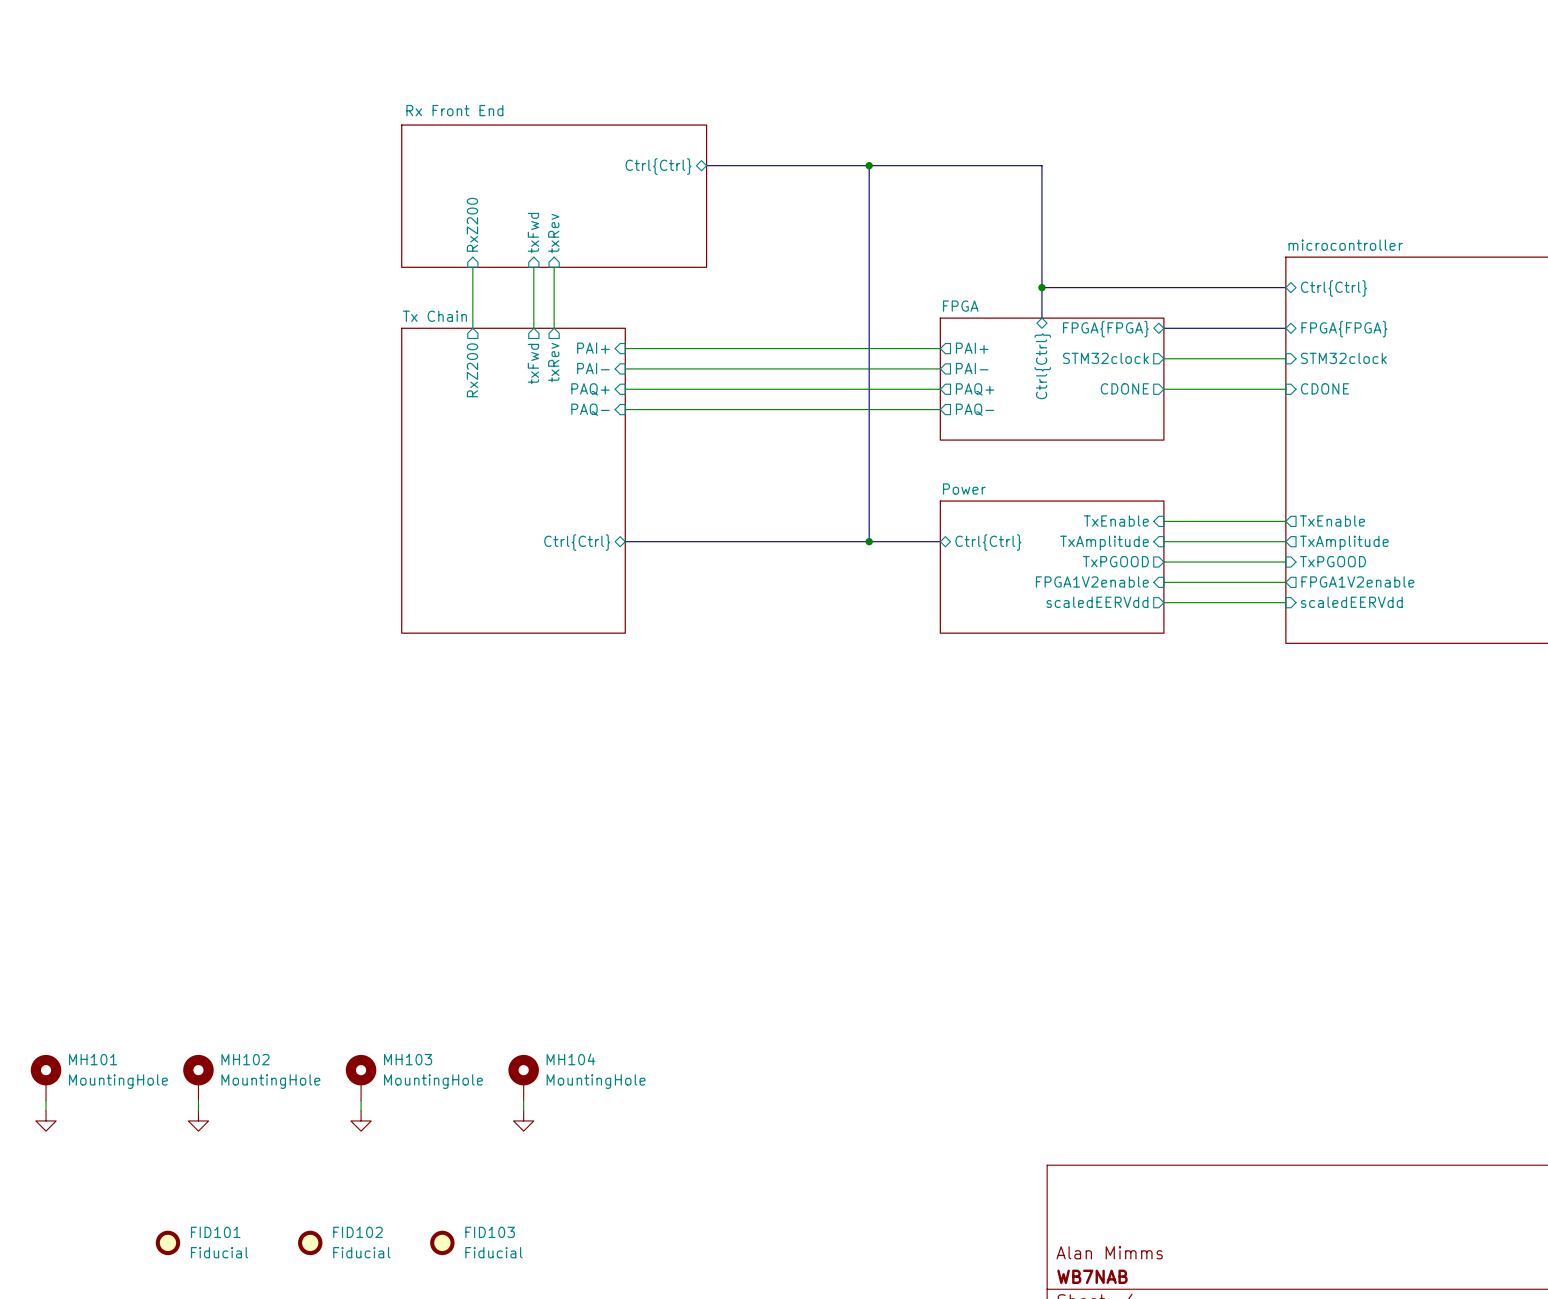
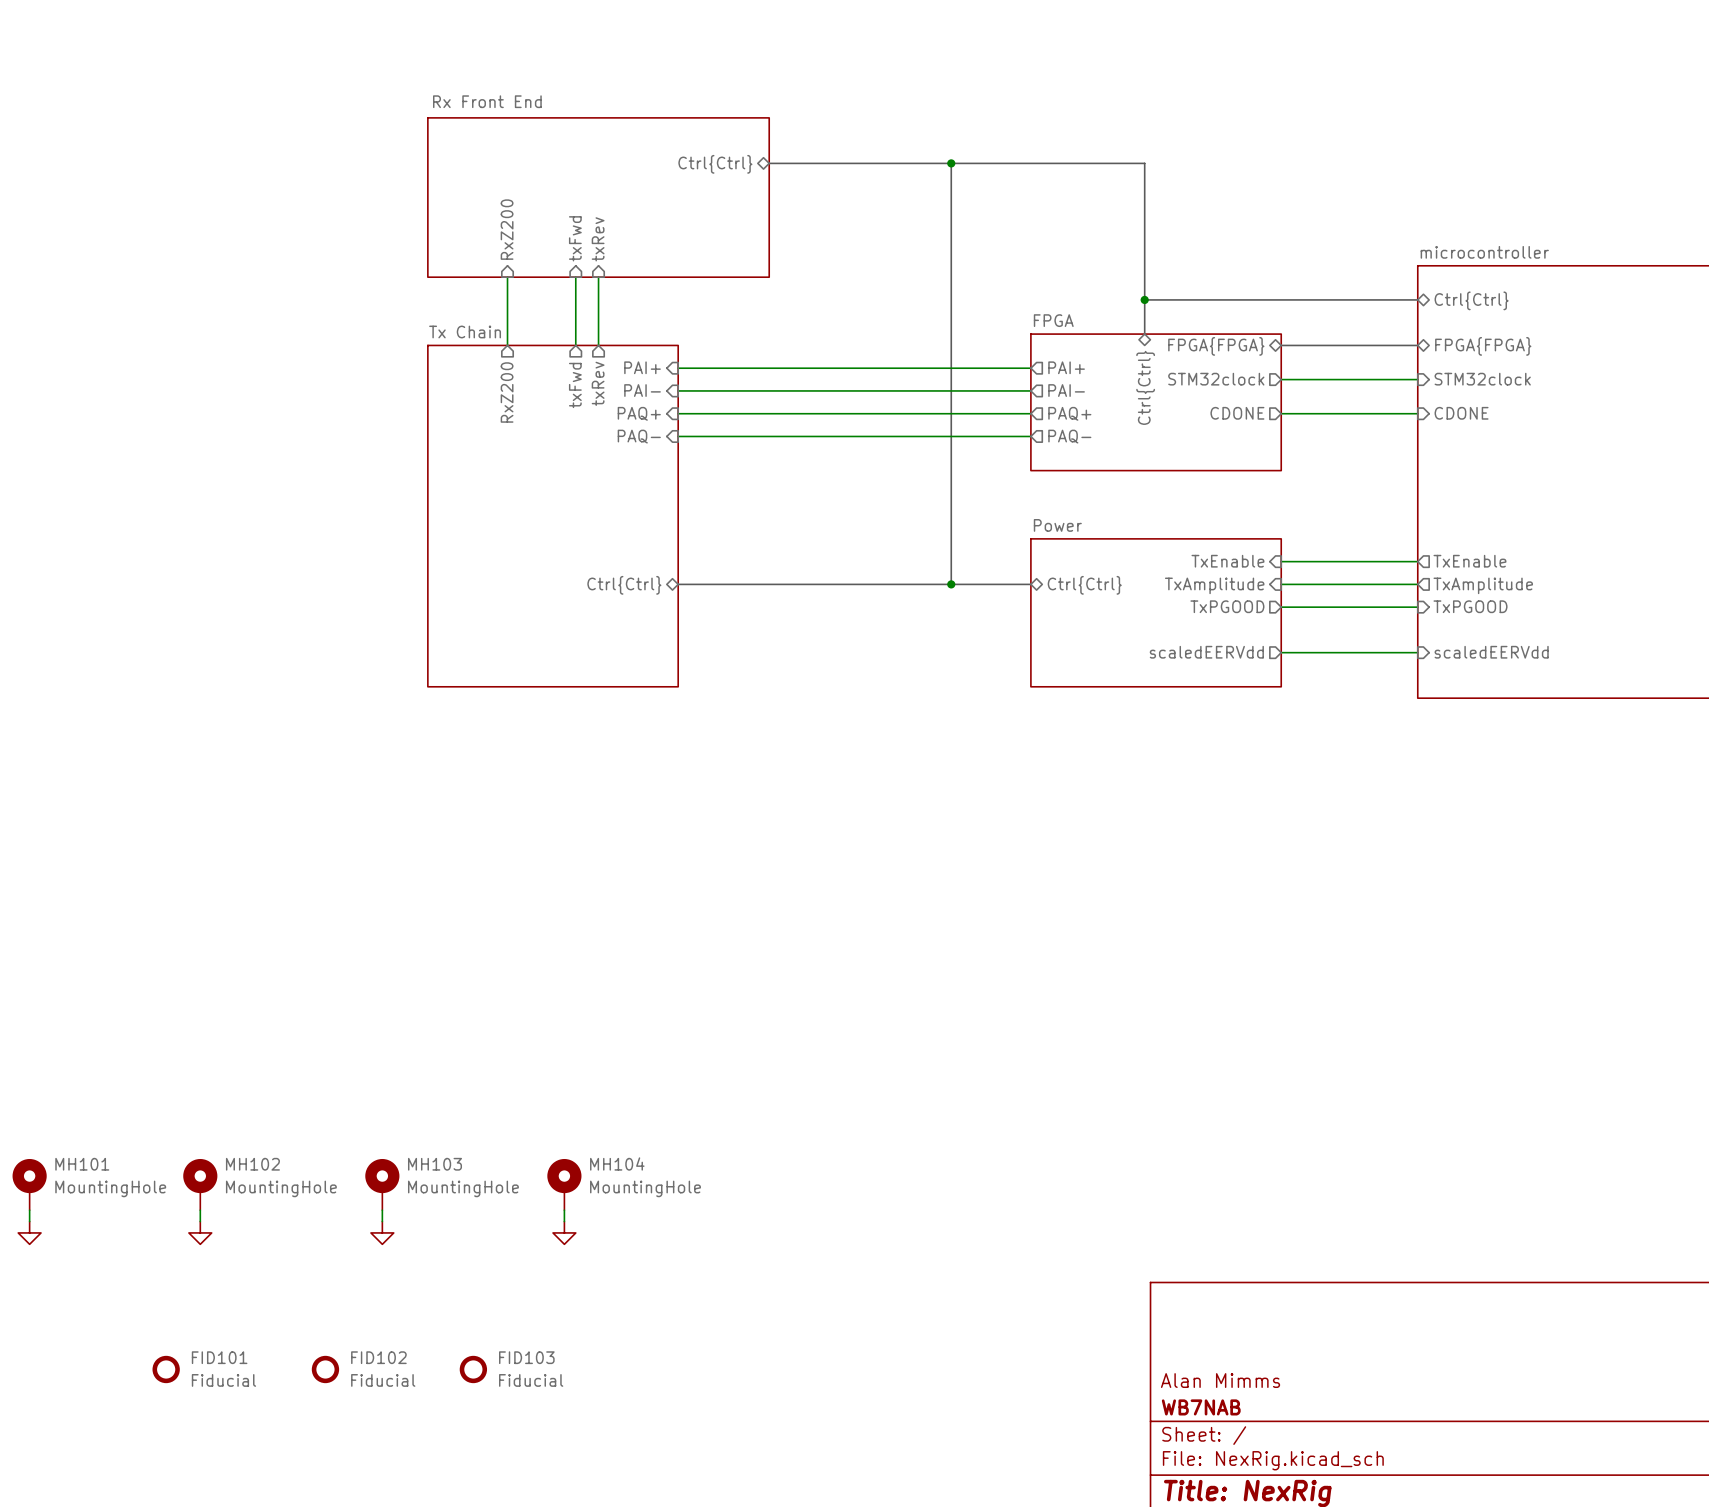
sheet pin: FPGA1V2enable (1092, 581) -> none
sheet pin: FPGA1V2enable (1357, 581) -> none
wire: (1163, 582) (1285, 582) -> none

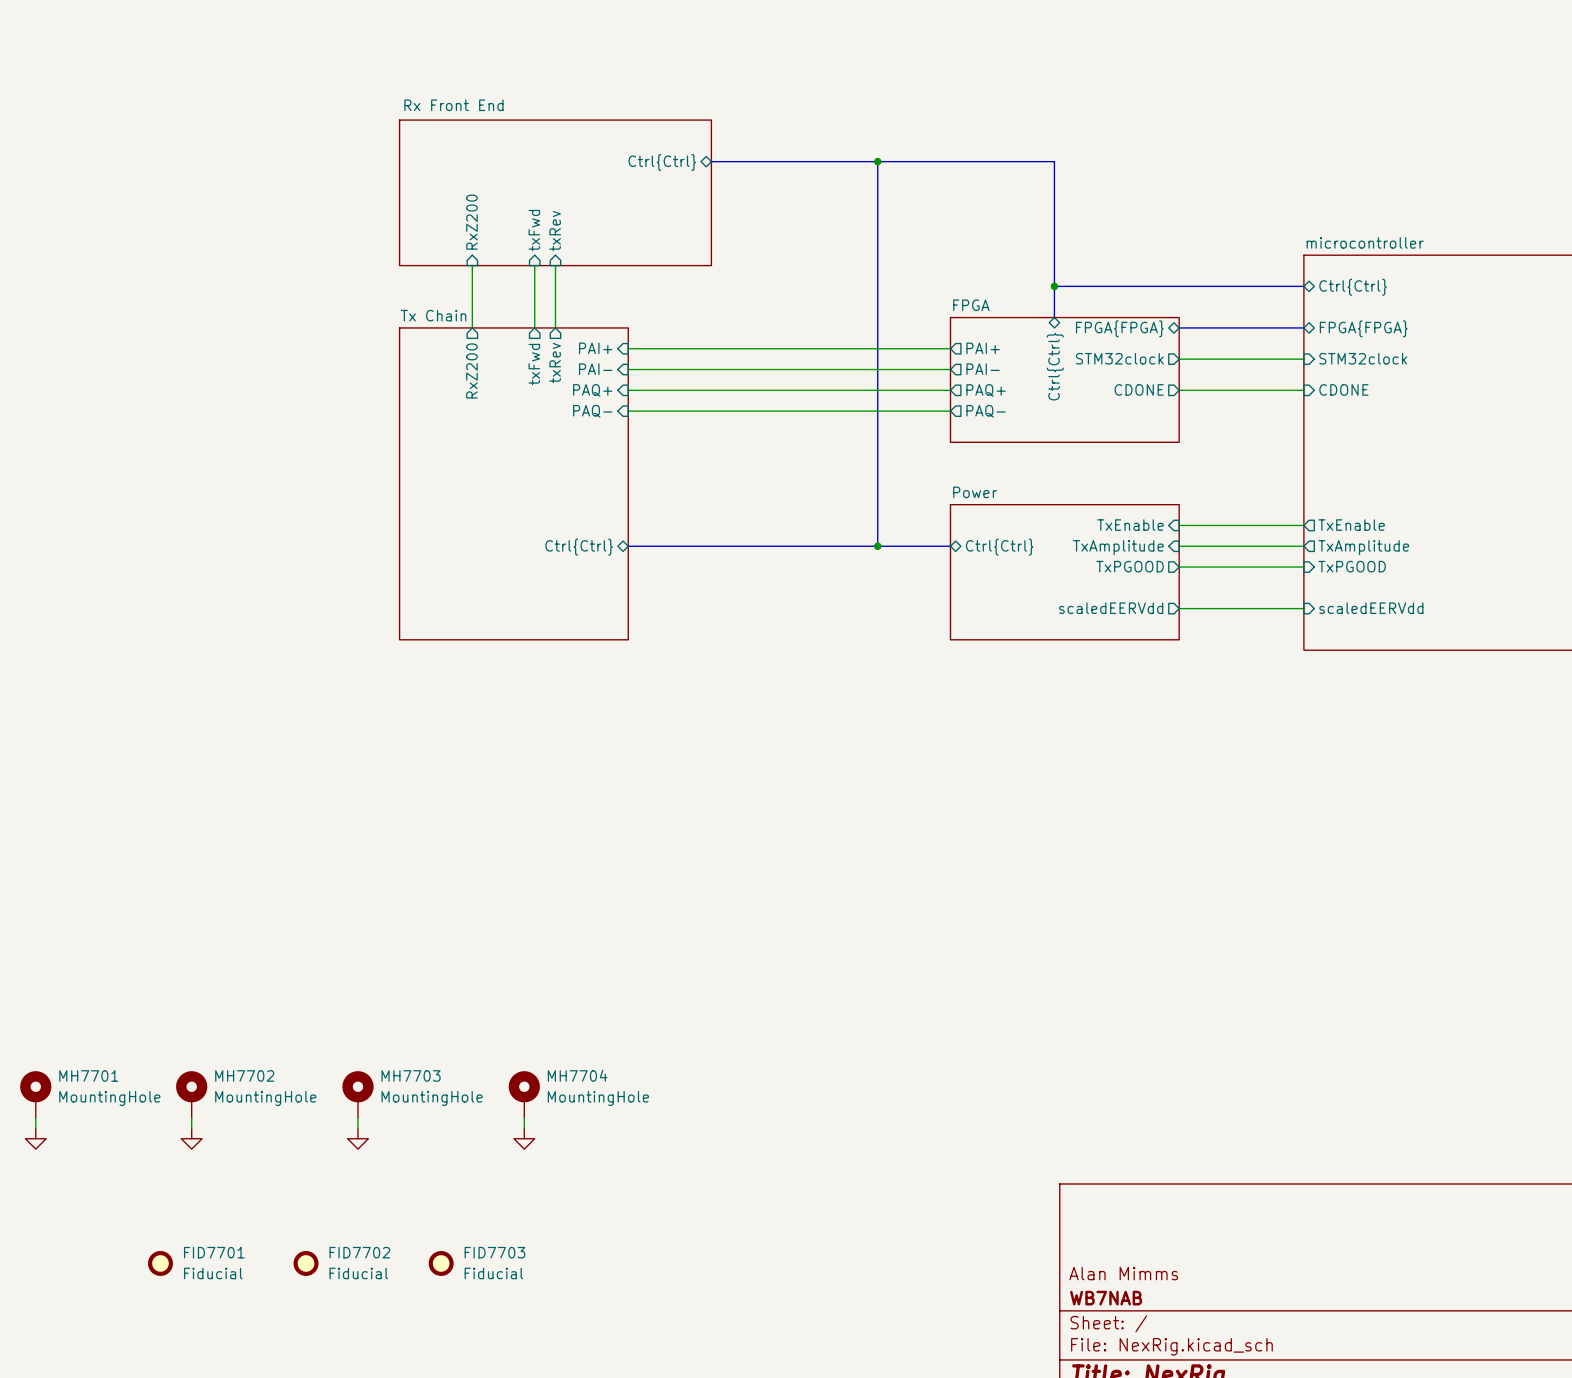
MH104 name: MH104 (617, 1163) -> MH7704 (577, 1075)
MH101 name: MH101 (82, 1164) -> MH7701 (88, 1075)
MH102 name: MH102 (252, 1164) -> MH7702 (244, 1075)
MH103 name: MH103 (434, 1164) -> MH7703 (411, 1075)
FID101 name: FID101 (219, 1357) -> FID7701 (214, 1252)
FID102 name: FID102 (378, 1357) -> FID7702 (359, 1252)
FID103 name: FID103 (526, 1357) -> FID7703 (494, 1252)

